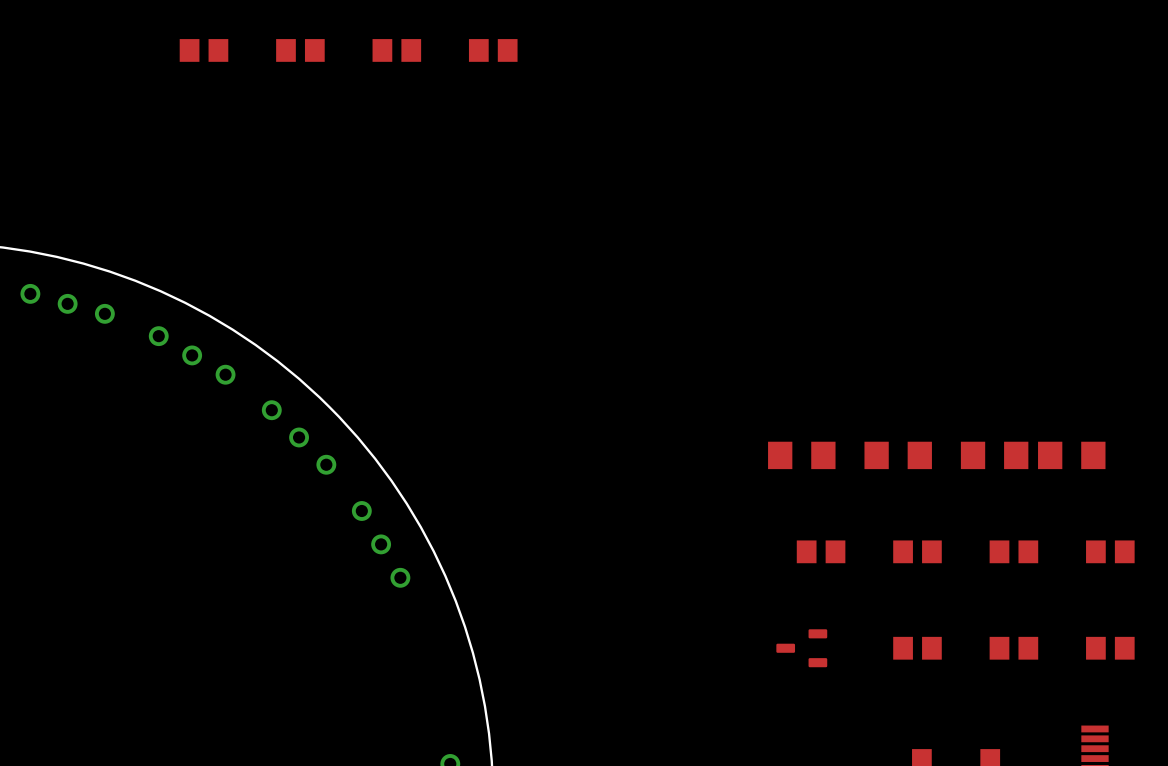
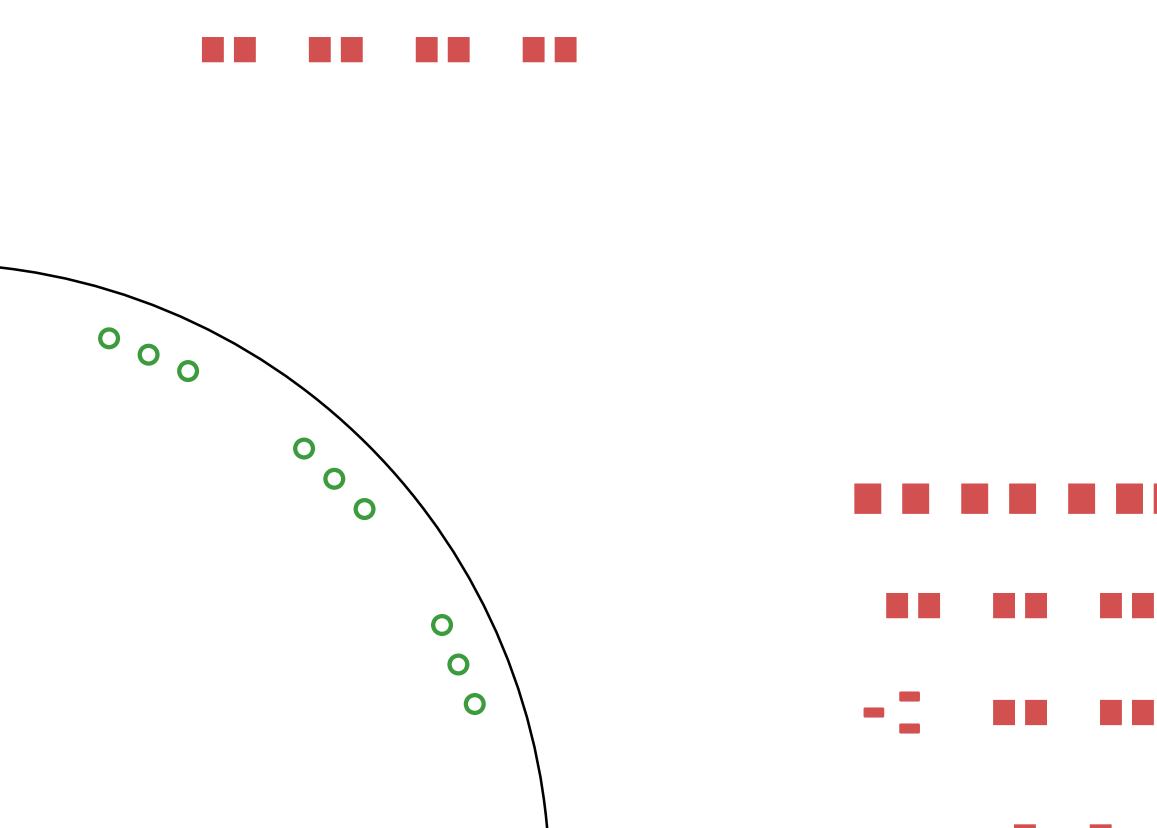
part: (67, 303) -> none
part: none -> (148, 354)
part: (192, 355) -> none
part: (381, 544) -> none
part: none -> (458, 664)

